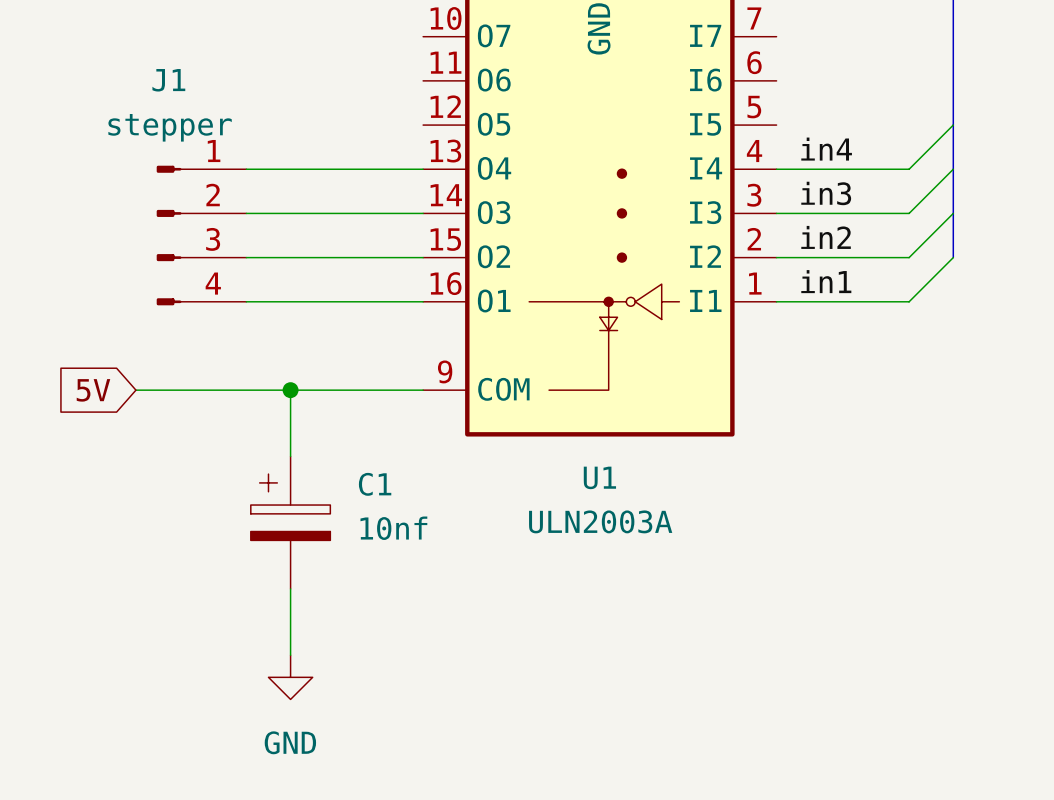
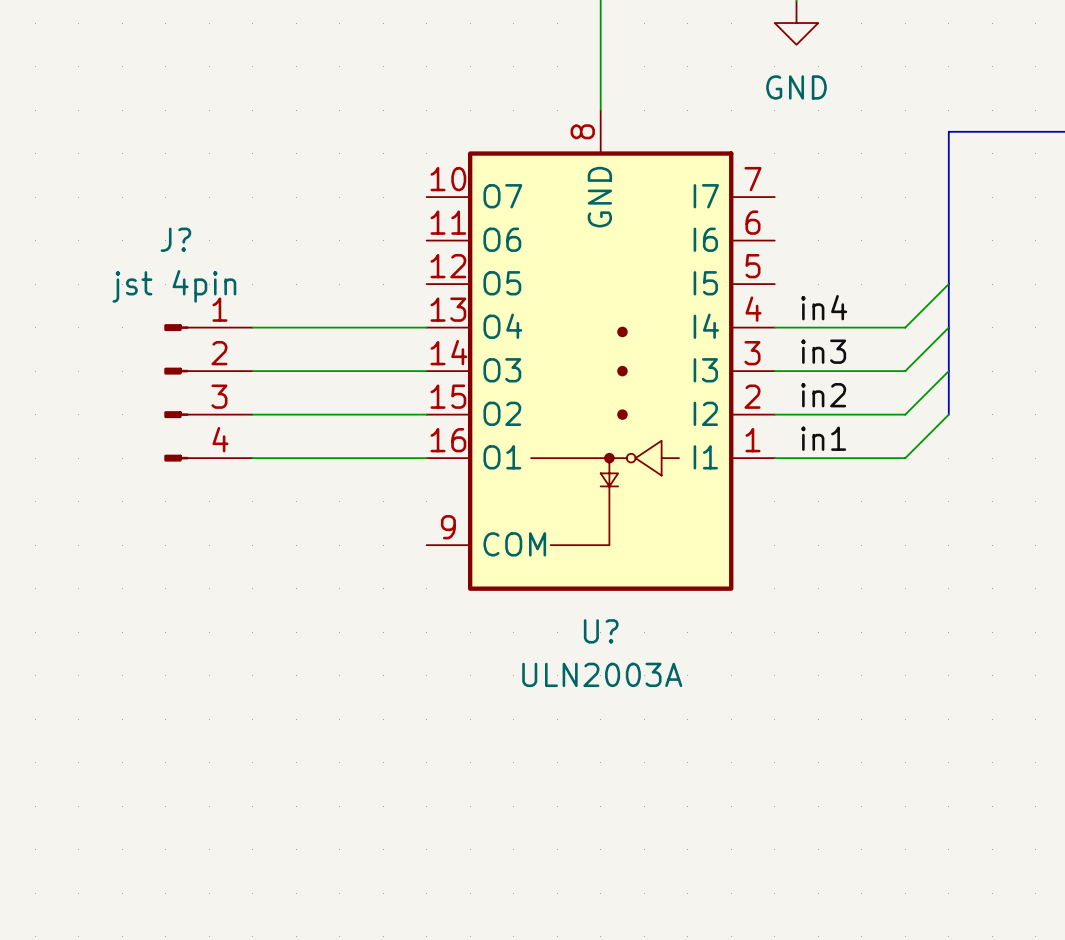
J1 name: J1 (168, 80) -> J? (175, 239)
J1 value: stepper (170, 127) -> jst 4pin (174, 286)
global label: 5V (93, 390) -> none
wire: (135, 390) (423, 390) -> none
wire: (290, 390) (290, 456) -> none
junction: (290, 390) -> none
U1 name: U1 (599, 477) -> U? (601, 631)
C1: 10nf (290, 522) -> none
wire: (290, 588) (290, 655) -> none
power symbol: GND (290, 677) -> none

